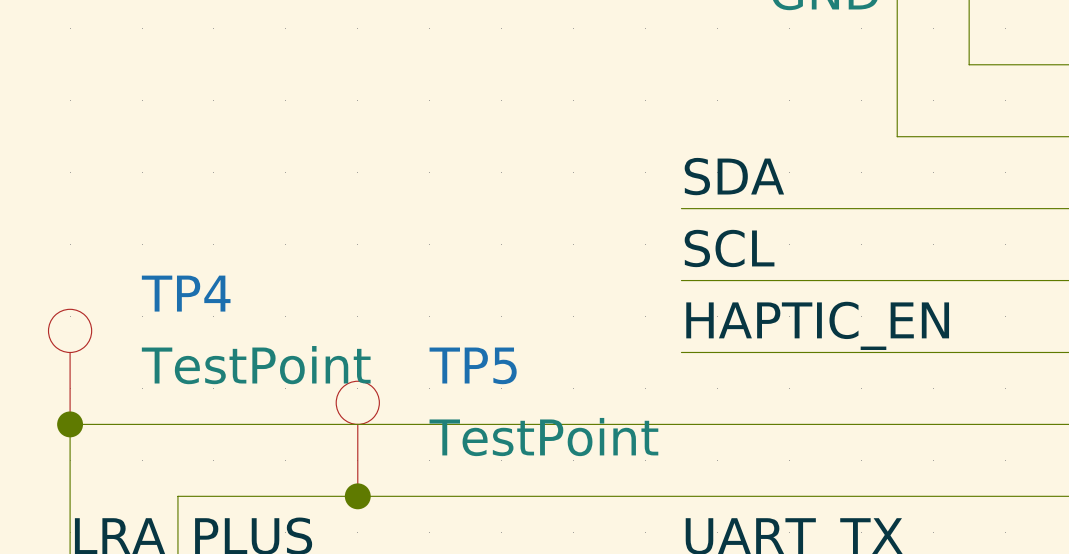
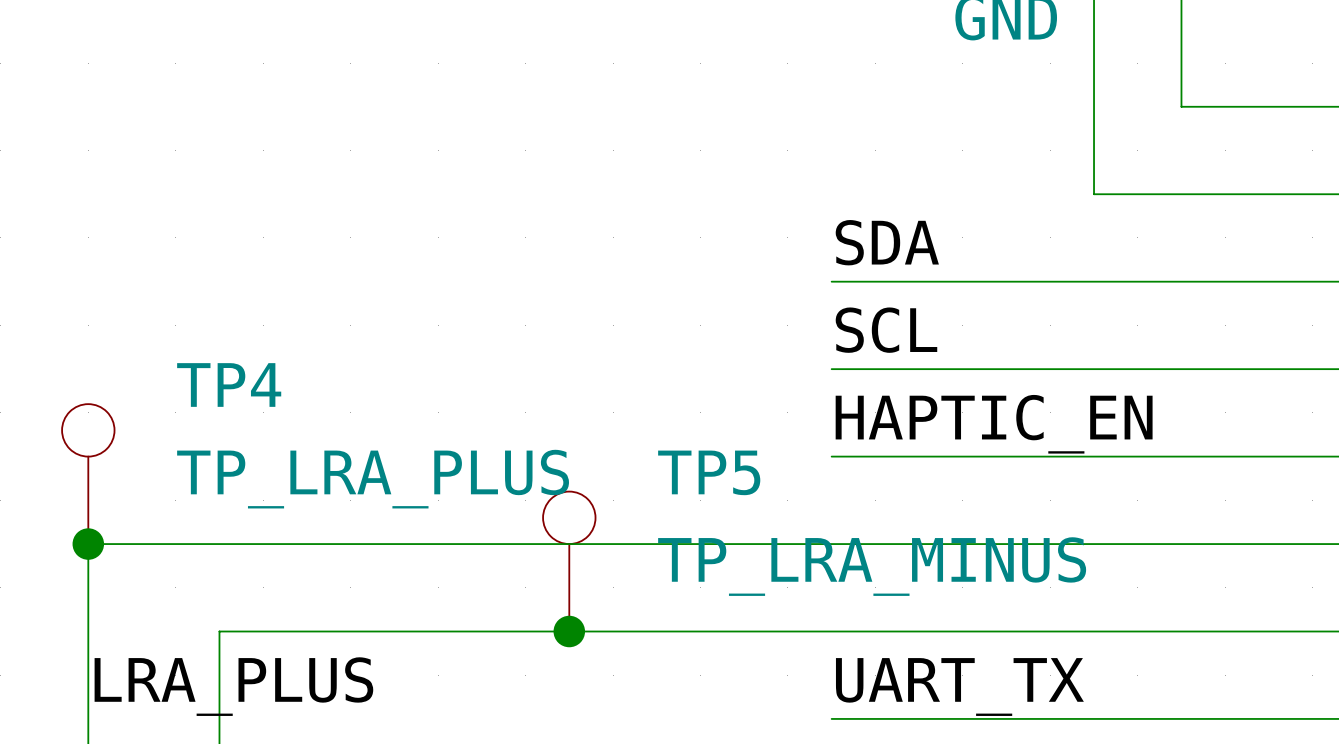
TP4 value: TestPoint (256, 365) -> TP_LRA_PLUS (373, 479)
TP5 value: TestPoint (543, 437) -> TP_LRA_MINUS (872, 566)
TP5 position: (357, 438) -> (569, 561)
junction position: (357, 496) -> (569, 631)

